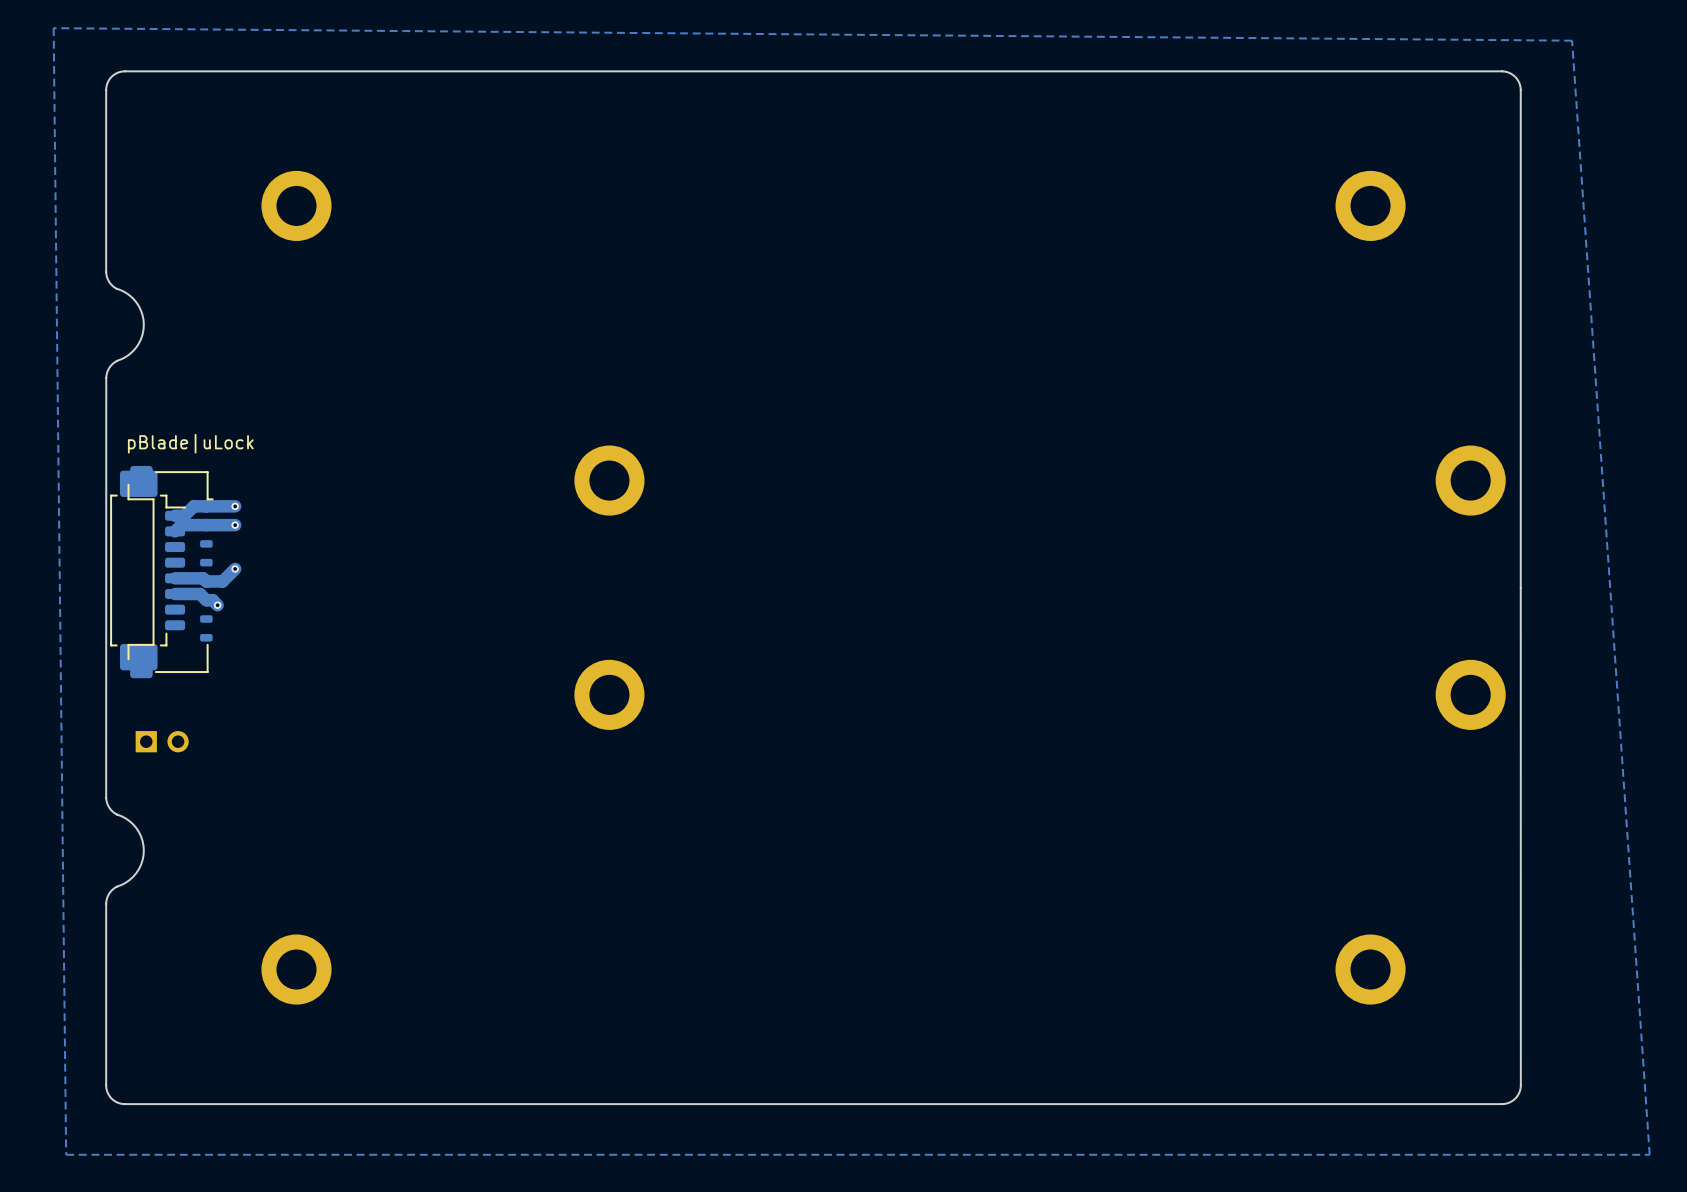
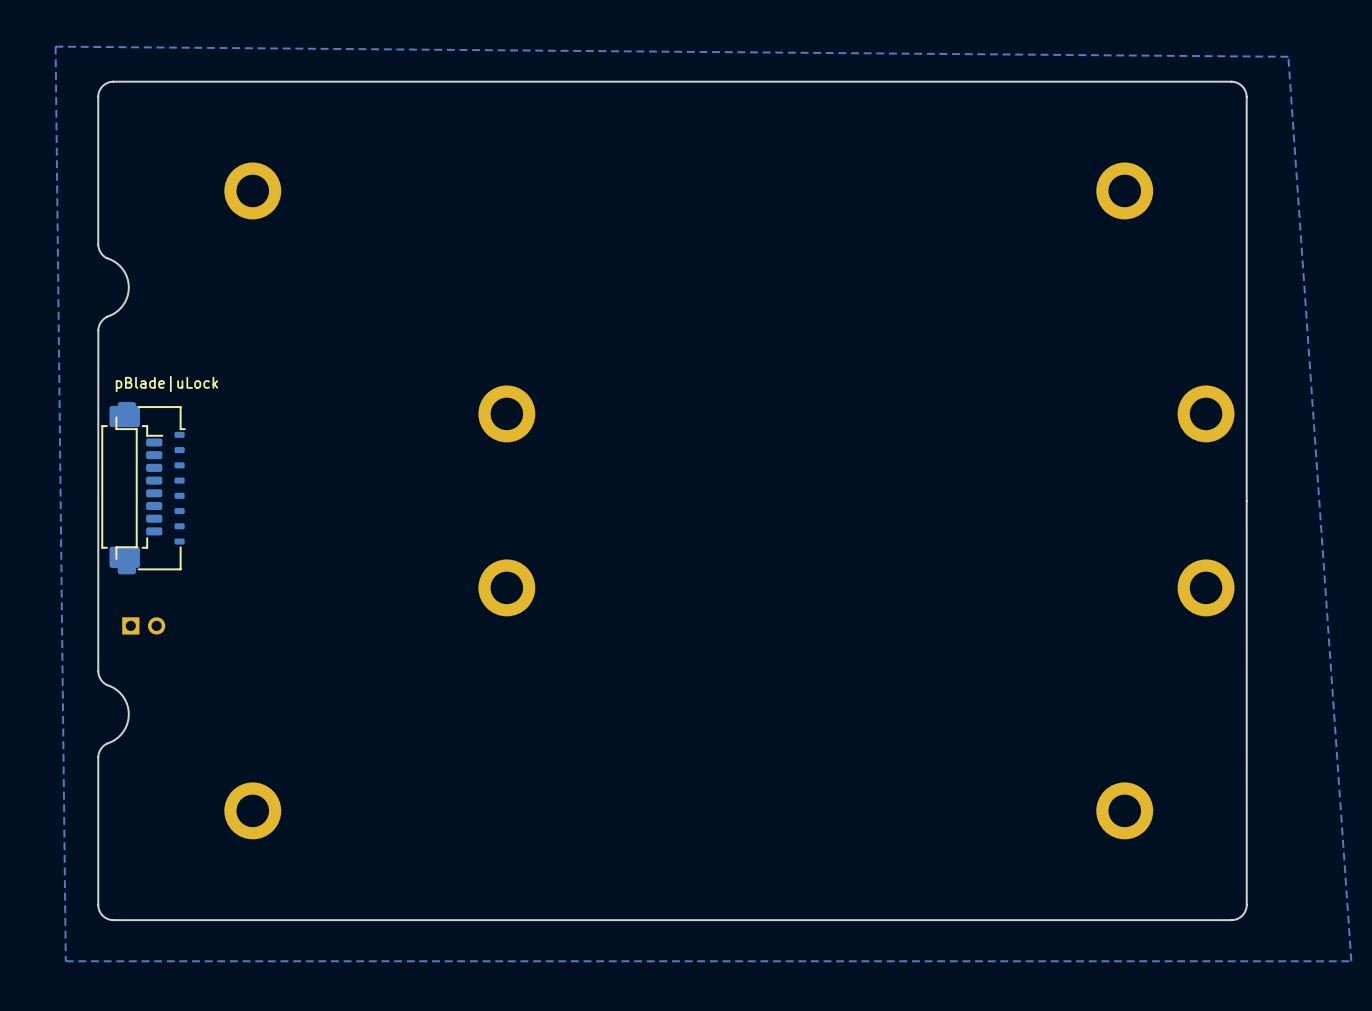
track: (235, 506) (193, 506) (184, 515) (175, 515) -> none
via: (235, 506) -> none
track: (235, 525) (181, 525) (175, 531) -> none
via: (235, 525) -> none
track: (235, 568) (222, 581) (206, 581) (203, 578) (175, 578) -> none
via: (235, 568) -> none
track: (175, 593) (200, 593) (206, 600) (212, 600) (217, 605) -> none
via: (217, 605) -> none

